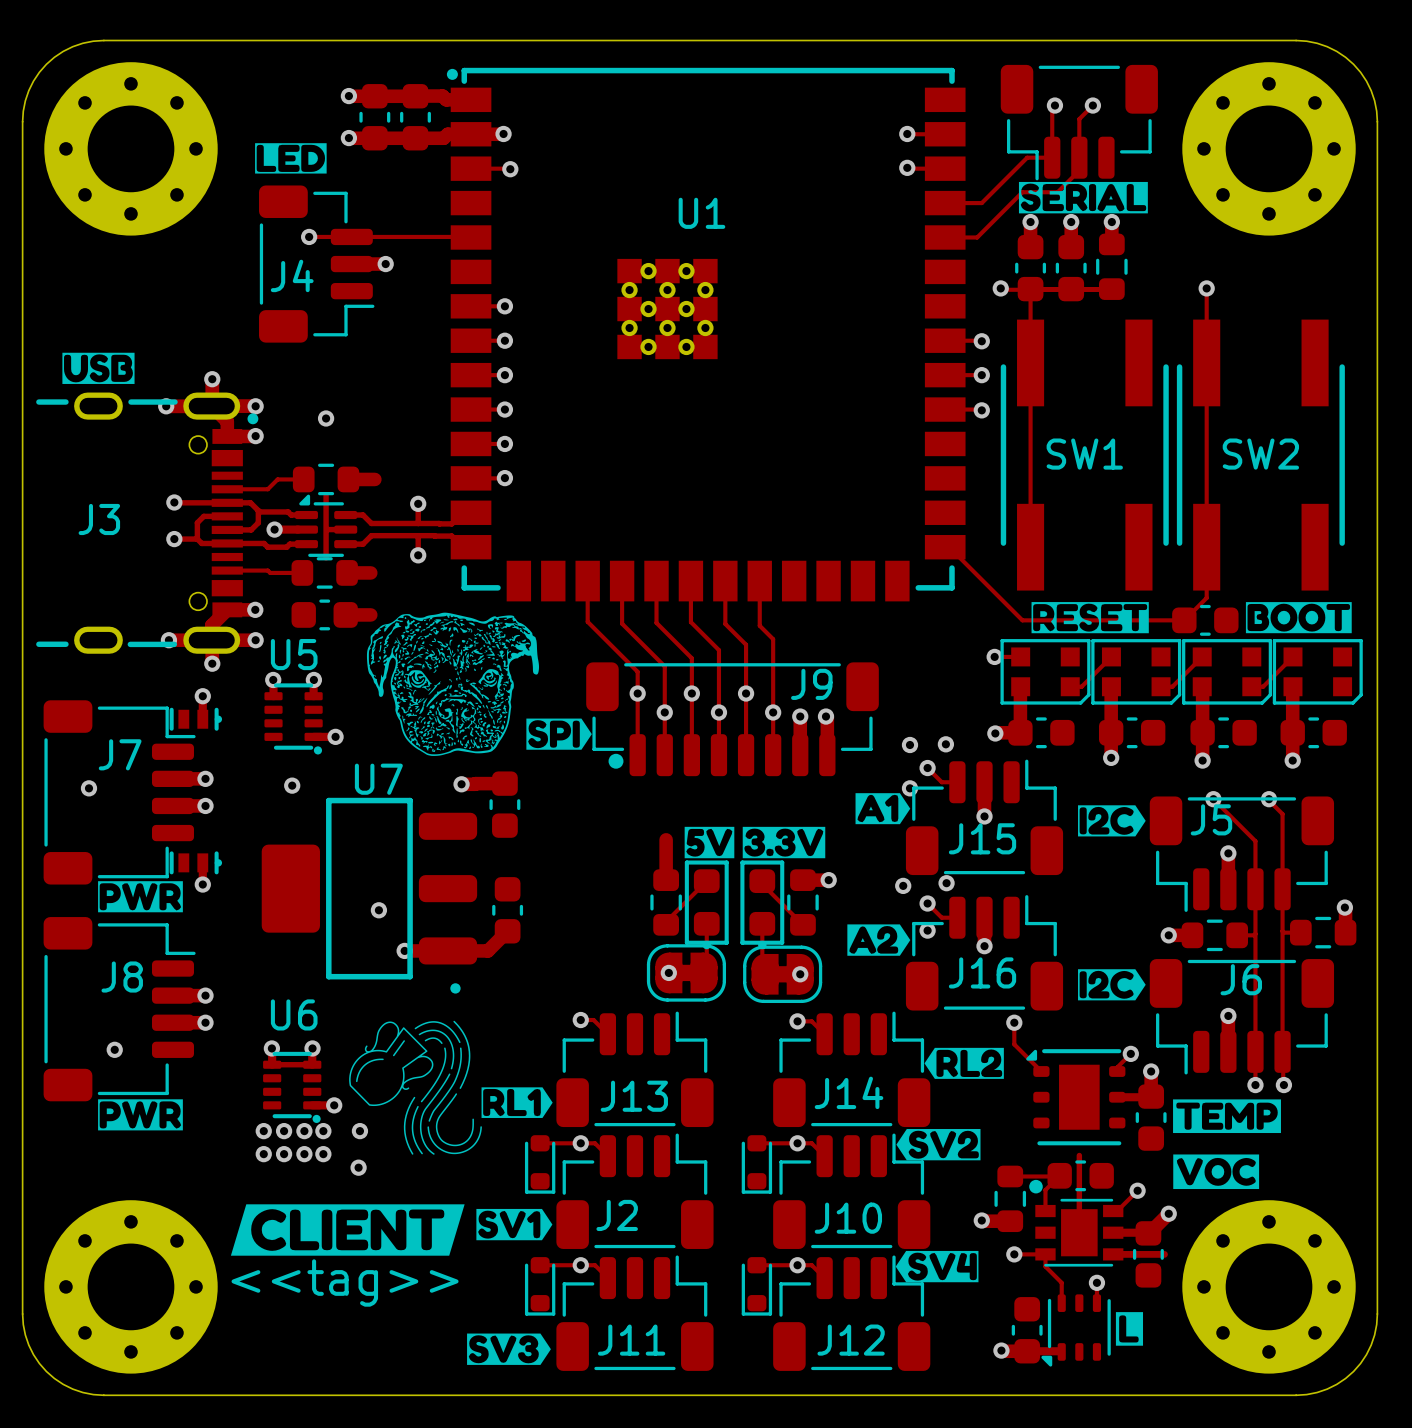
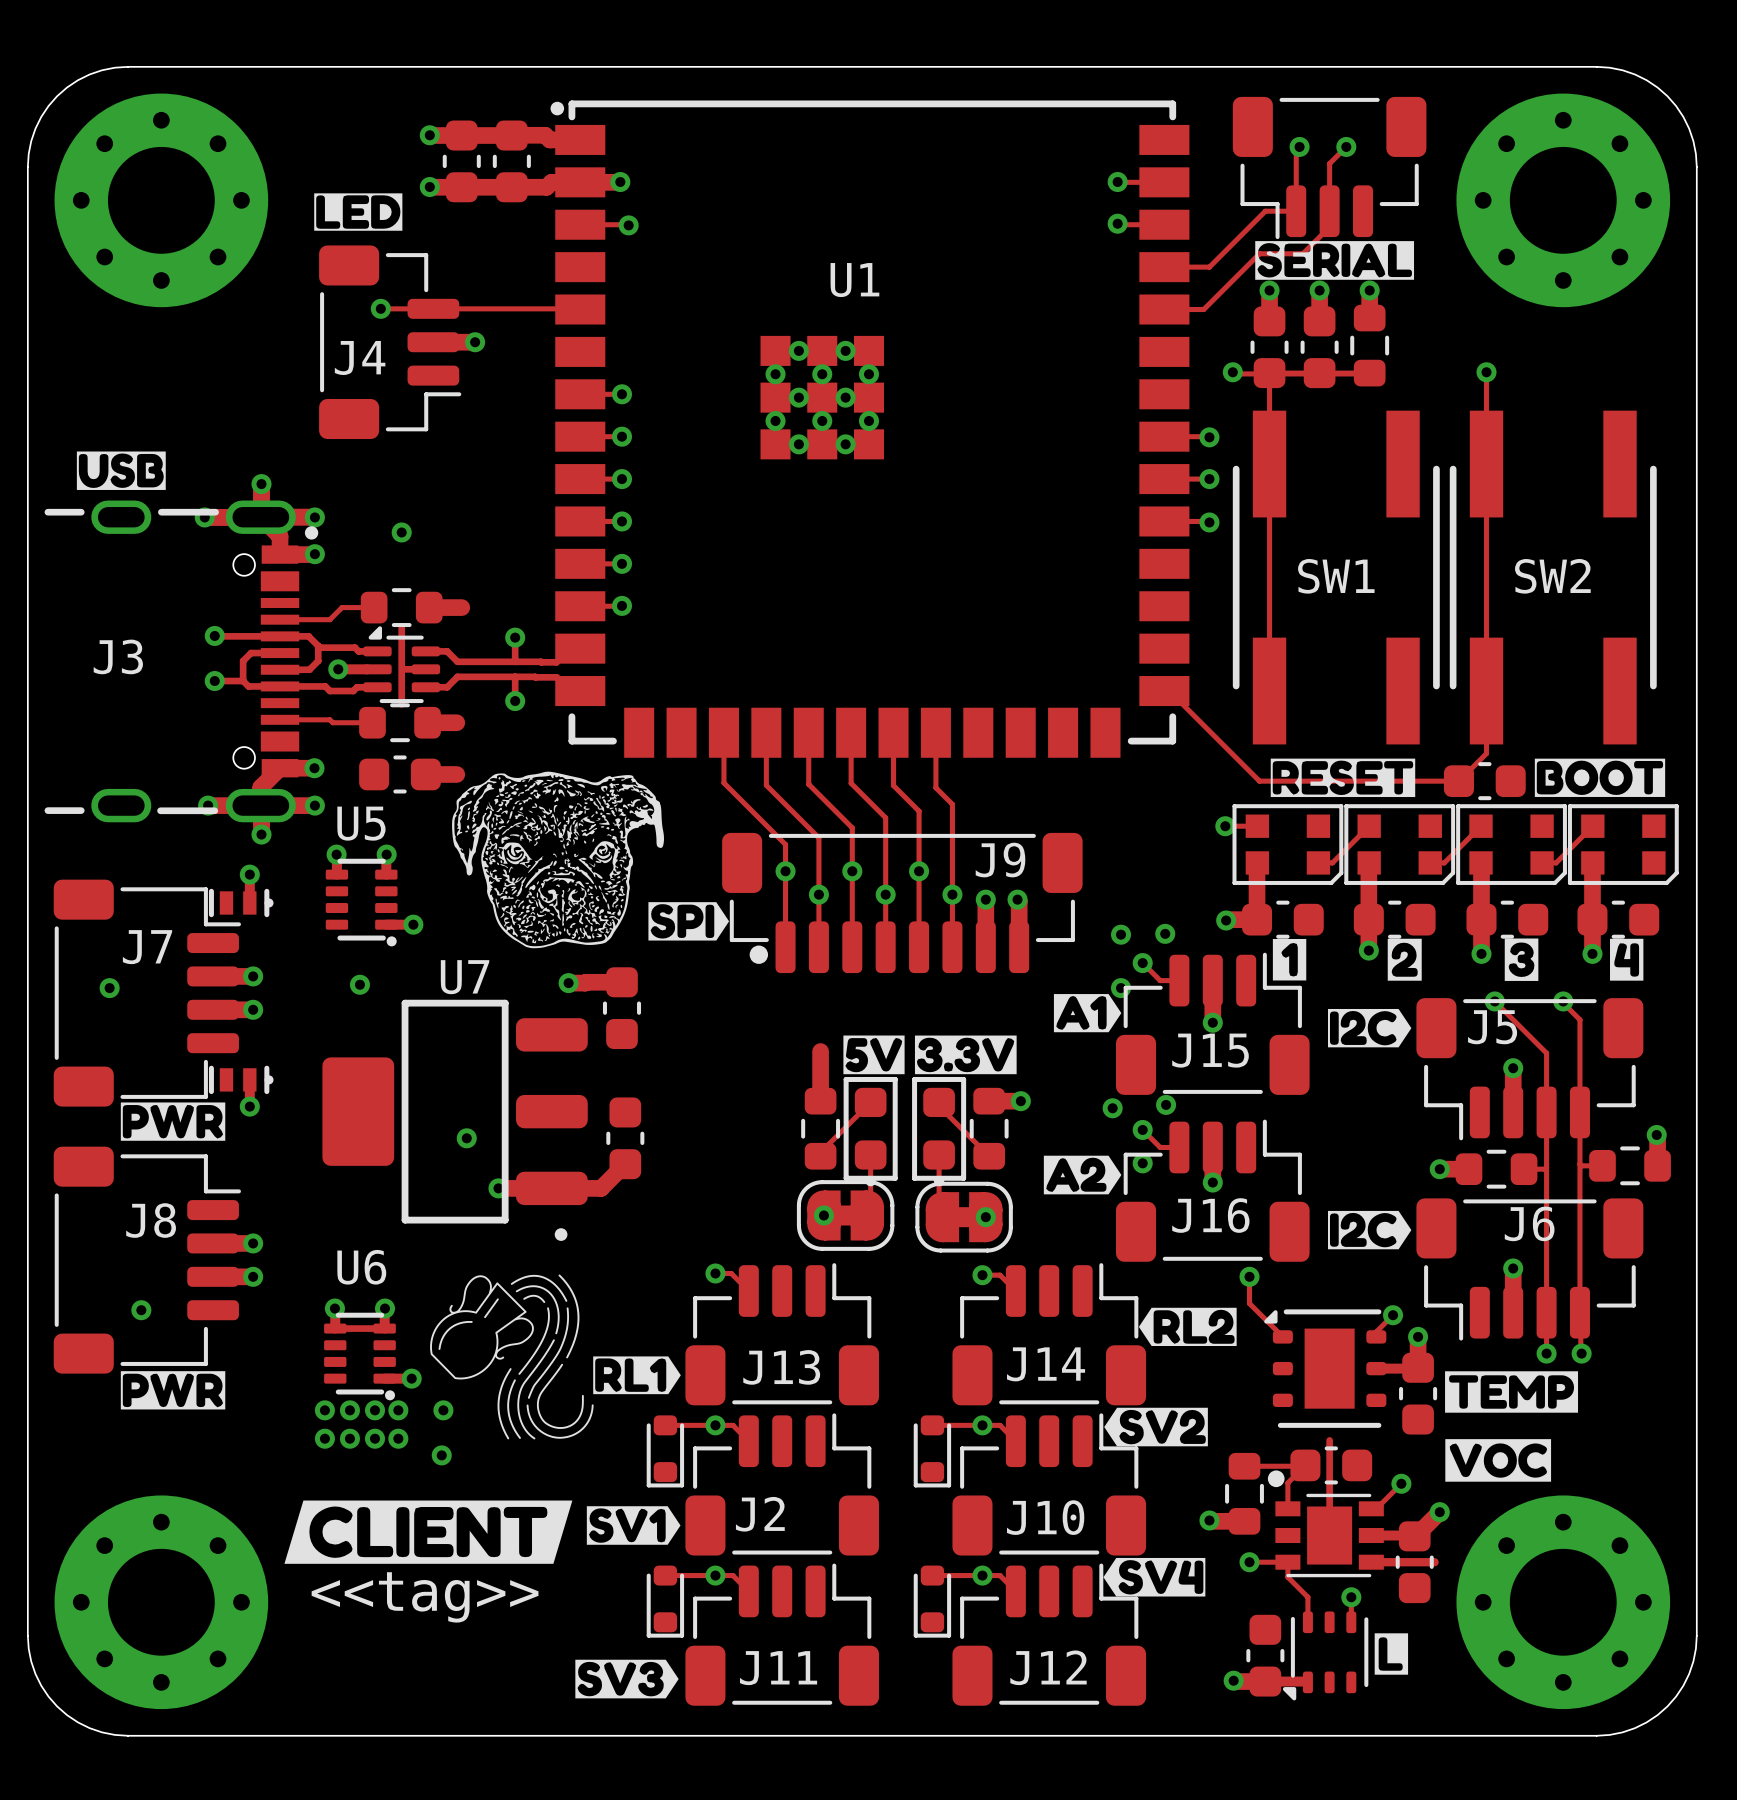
drawing: none -> [1272, 938, 1307, 981]
drawing: none -> [1387, 938, 1422, 981]
drawing: none -> [1504, 938, 1539, 981]
drawing: none -> [1610, 938, 1644, 981]

